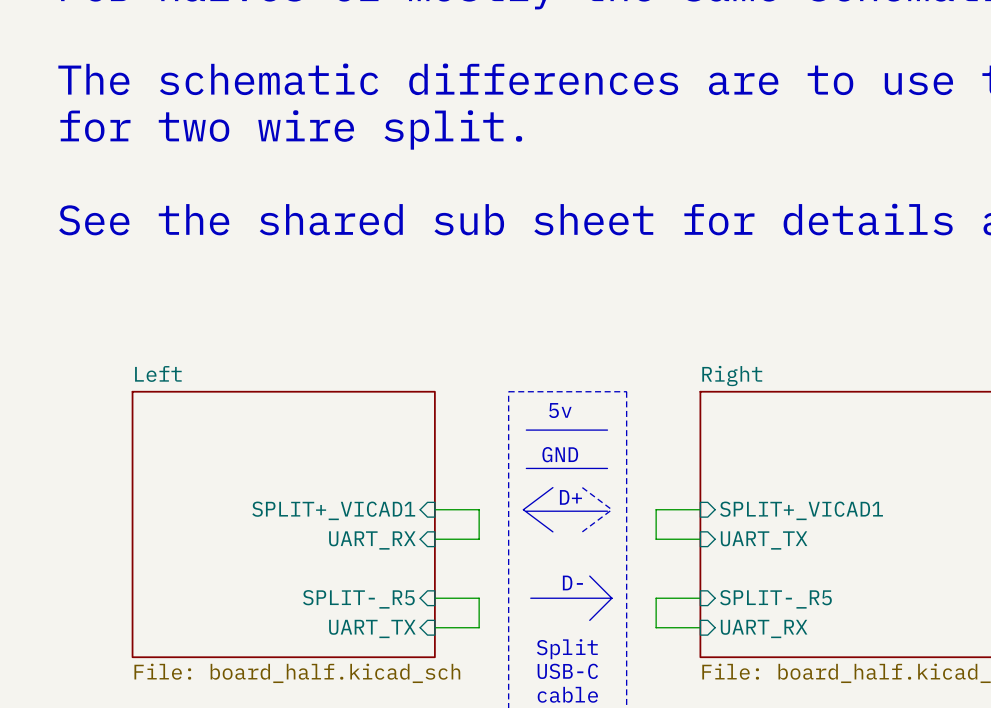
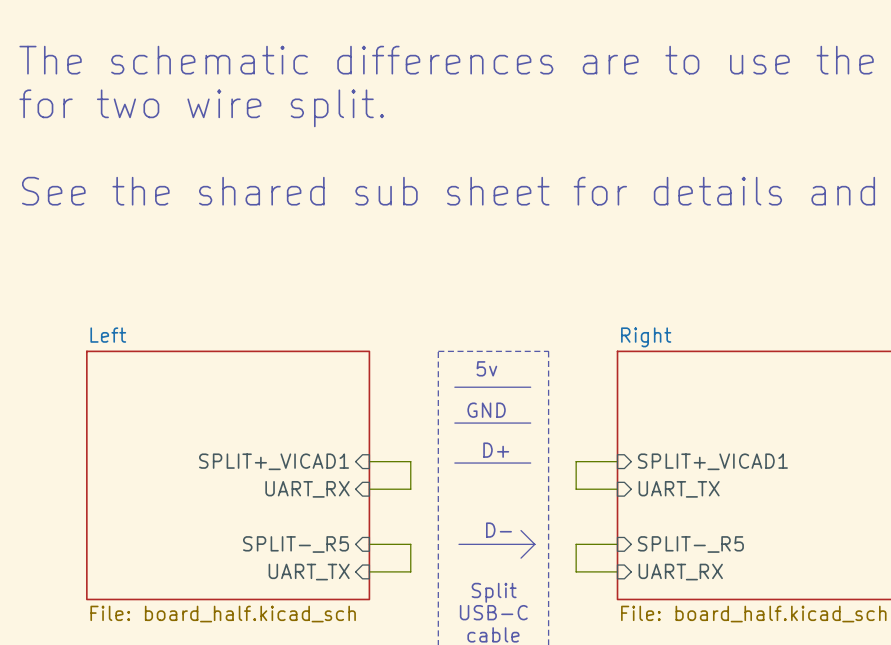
line: (552, 487) (523, 509) (552, 531) -> none
line: (582, 487) (611, 509) (582, 531) -> none
line: (589, 576) (597, 583) -> none
line: (597, 612) (589, 620) -> none

